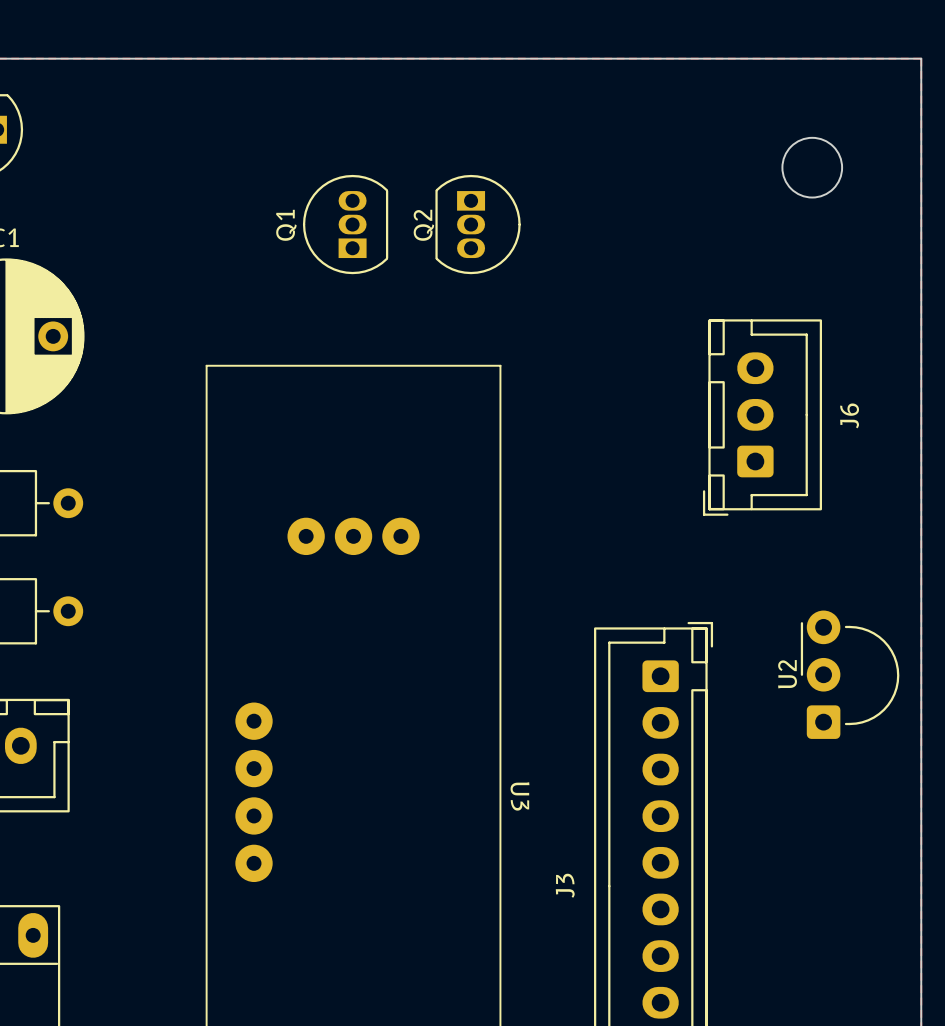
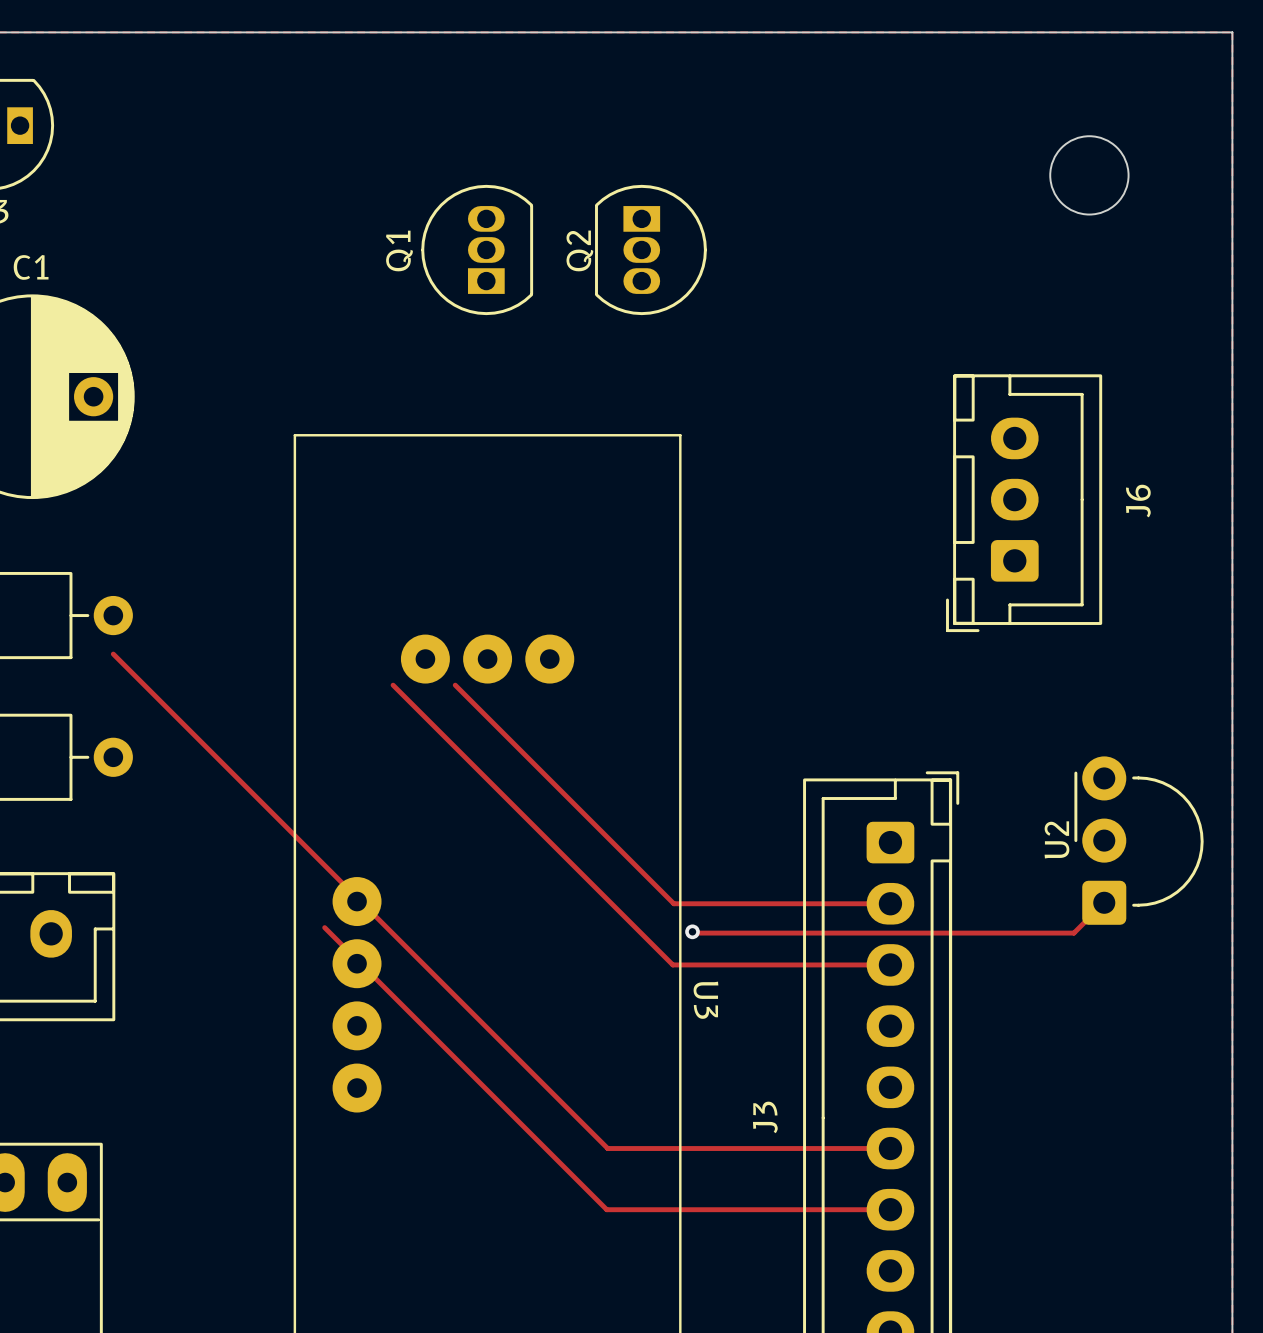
track: none -> (113, 654) (607, 1148) (890, 1148)
track: none -> (393, 685) (672, 964) (890, 964)
track: none -> (455, 685) (673, 903) (890, 903)
track: none -> (1104, 902) (1073, 933) (692, 931)
track: none -> (324, 927) (606, 1209) (890, 1209)
via: none -> (692, 931)

